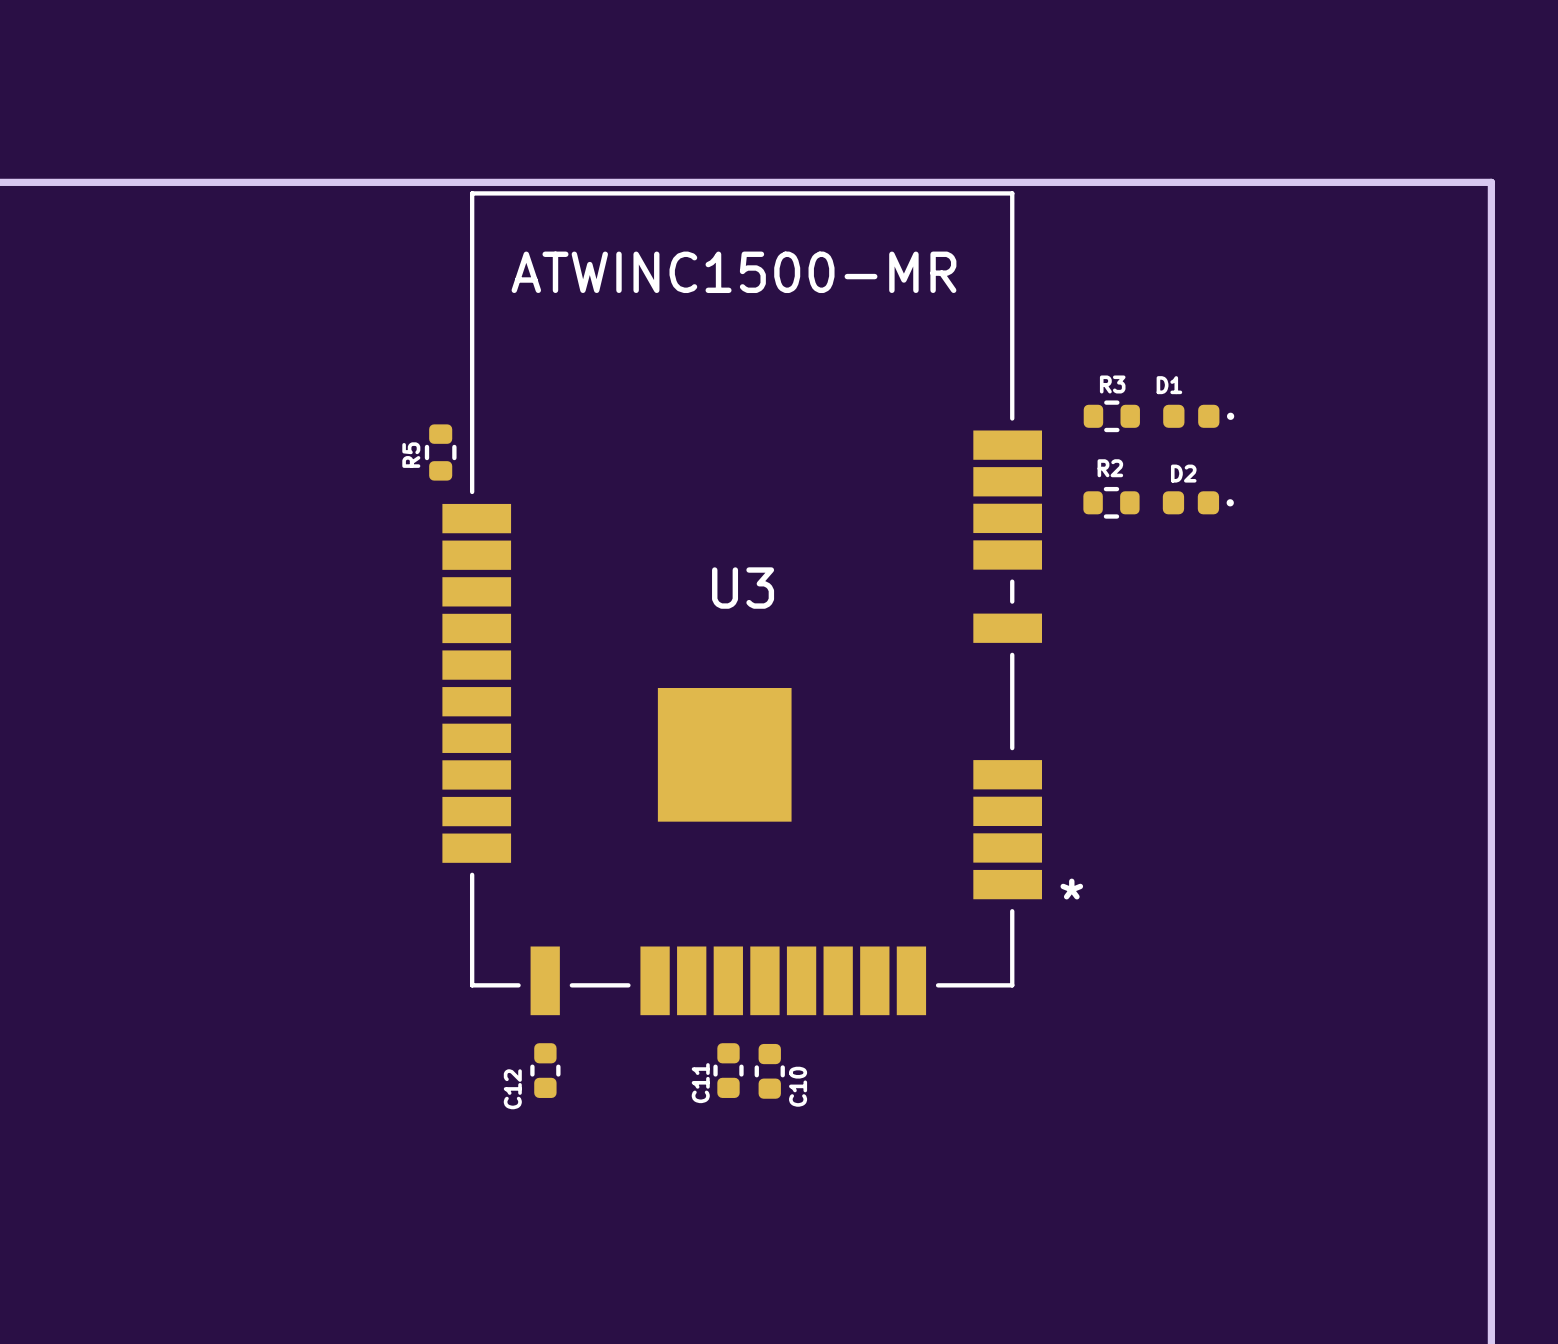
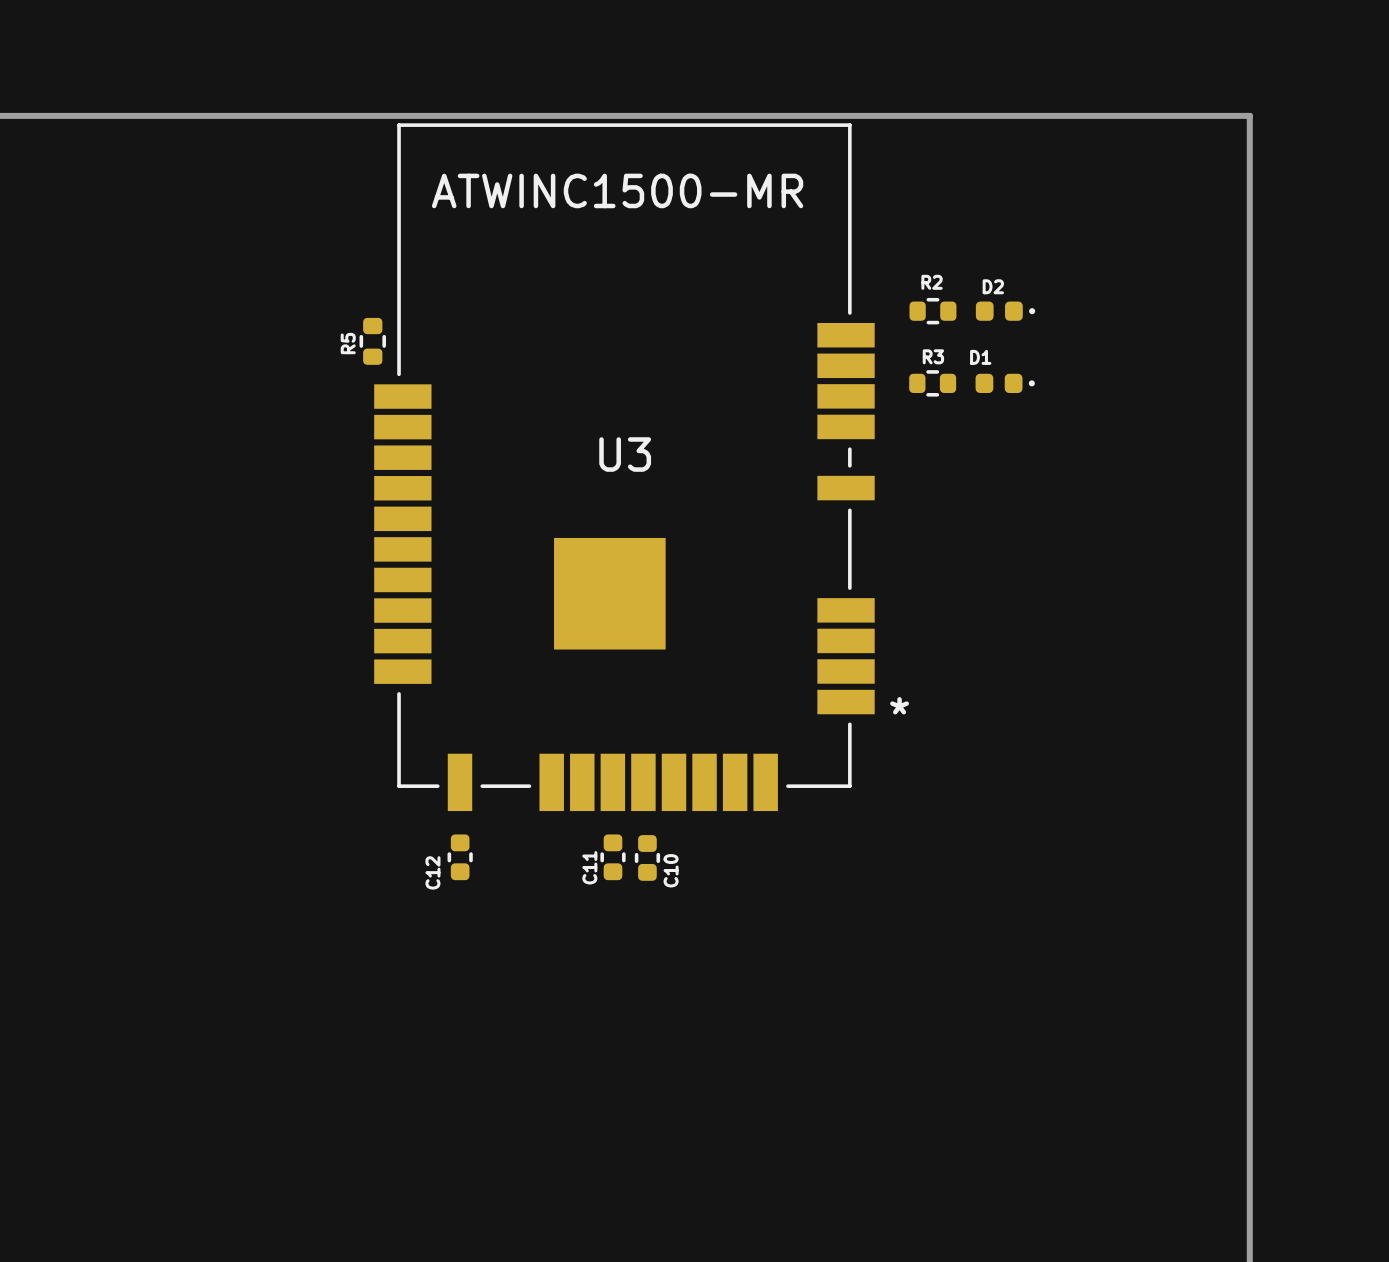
R3 name: R3 (1112, 384) -> R2 (932, 282)
D1 name: D1 (1169, 385) -> D2 (993, 286)
R2 name: R2 (1110, 468) -> R3 (933, 356)
D2 name: D2 (1183, 473) -> D1 (980, 357)

